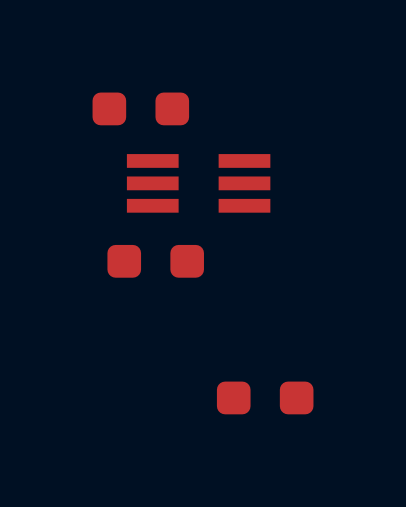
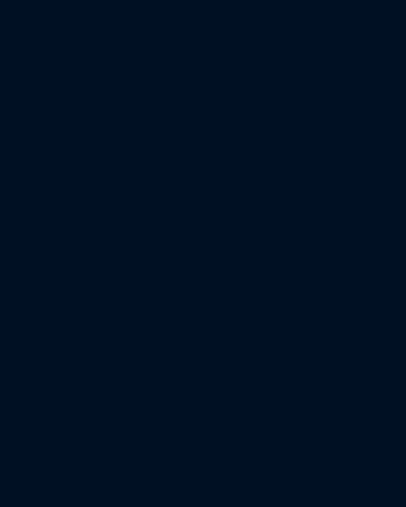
part: (140, 108) -> none
part: (198, 183) -> none
part: (155, 261) -> none
part: (265, 397) -> none

